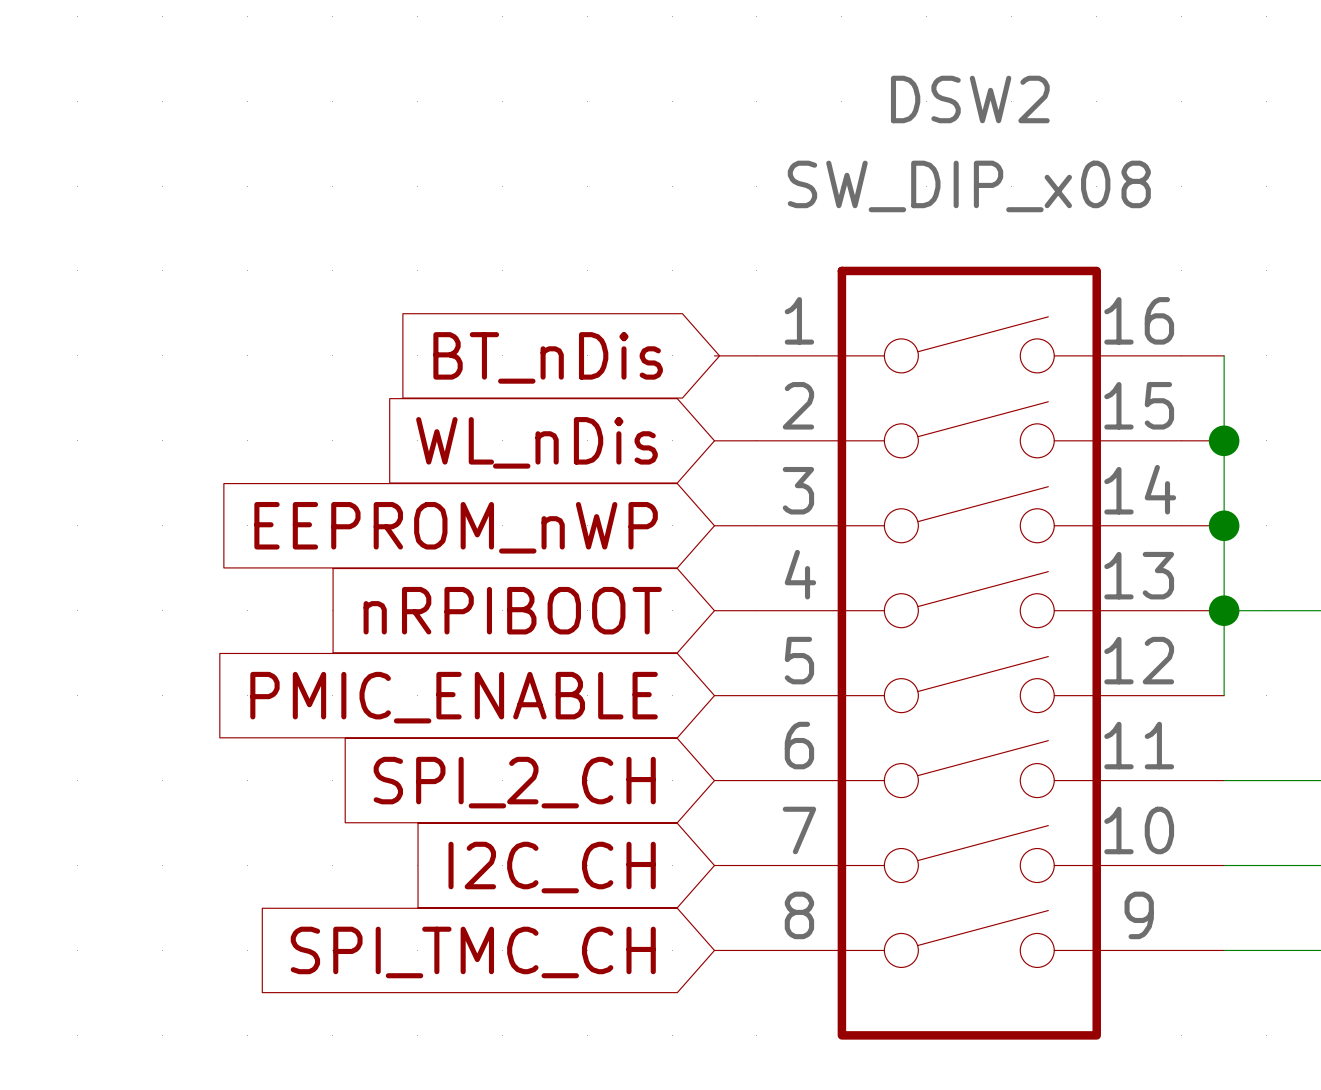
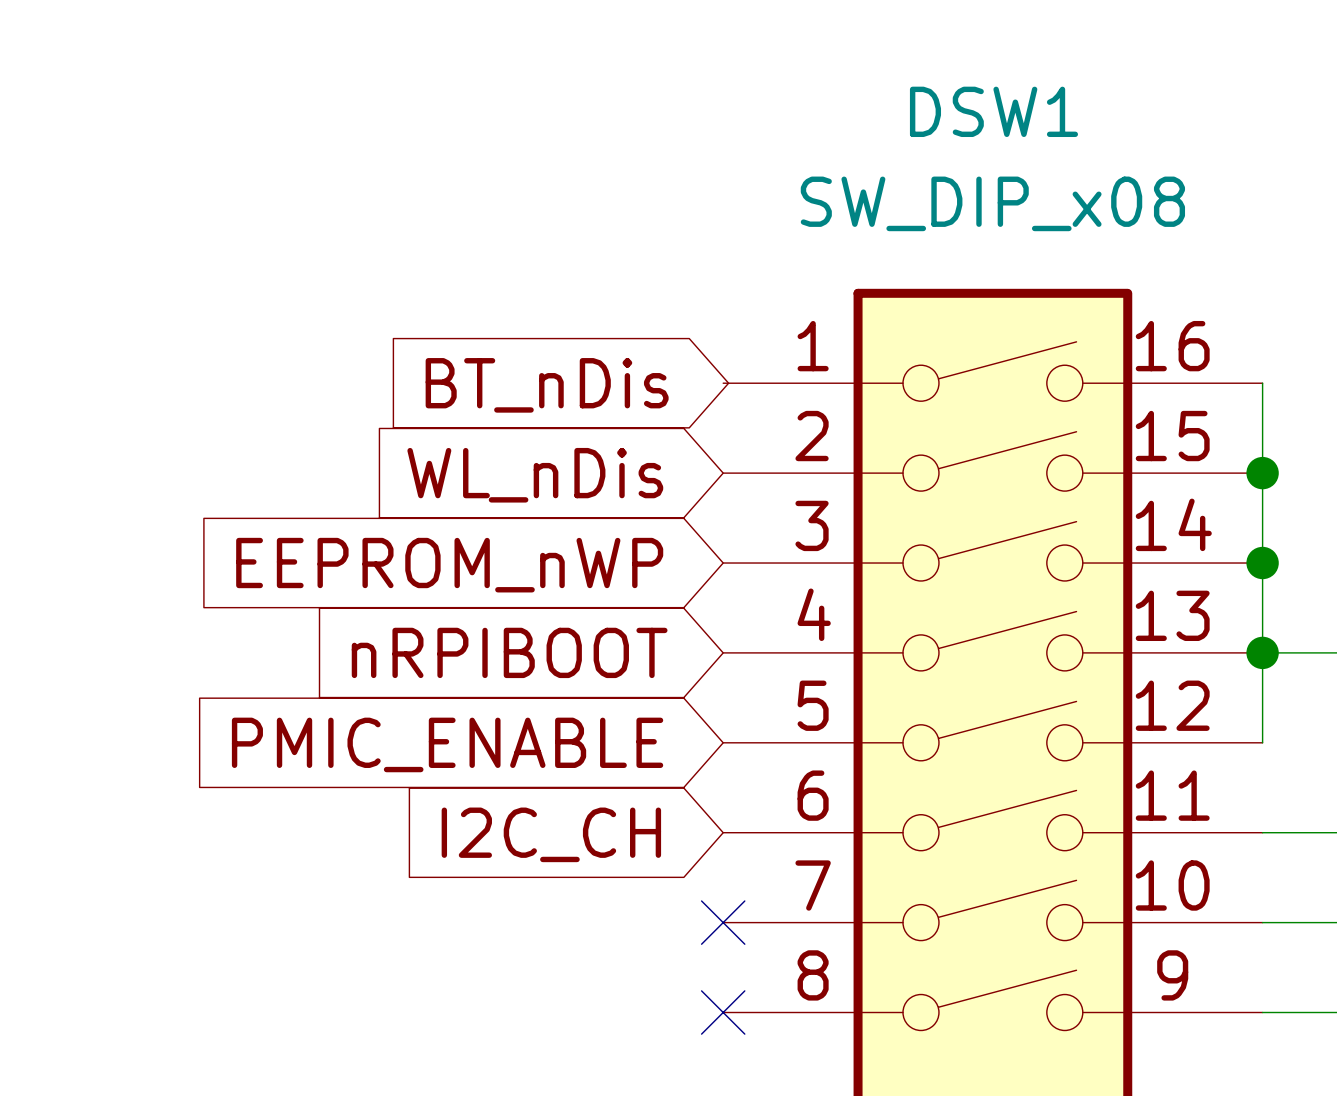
DSW2 name: DSW2 (970, 99) -> DSW1 (993, 111)
global label: SPI_2_CH (514, 782) -> I2C_CH (551, 834)
no-connect mark: none -> (723, 922)
global label: I2C_CH (552, 867) -> none
no-connect mark: none -> (723, 1012)
global label: SPI_TMC_CH (473, 952) -> none

